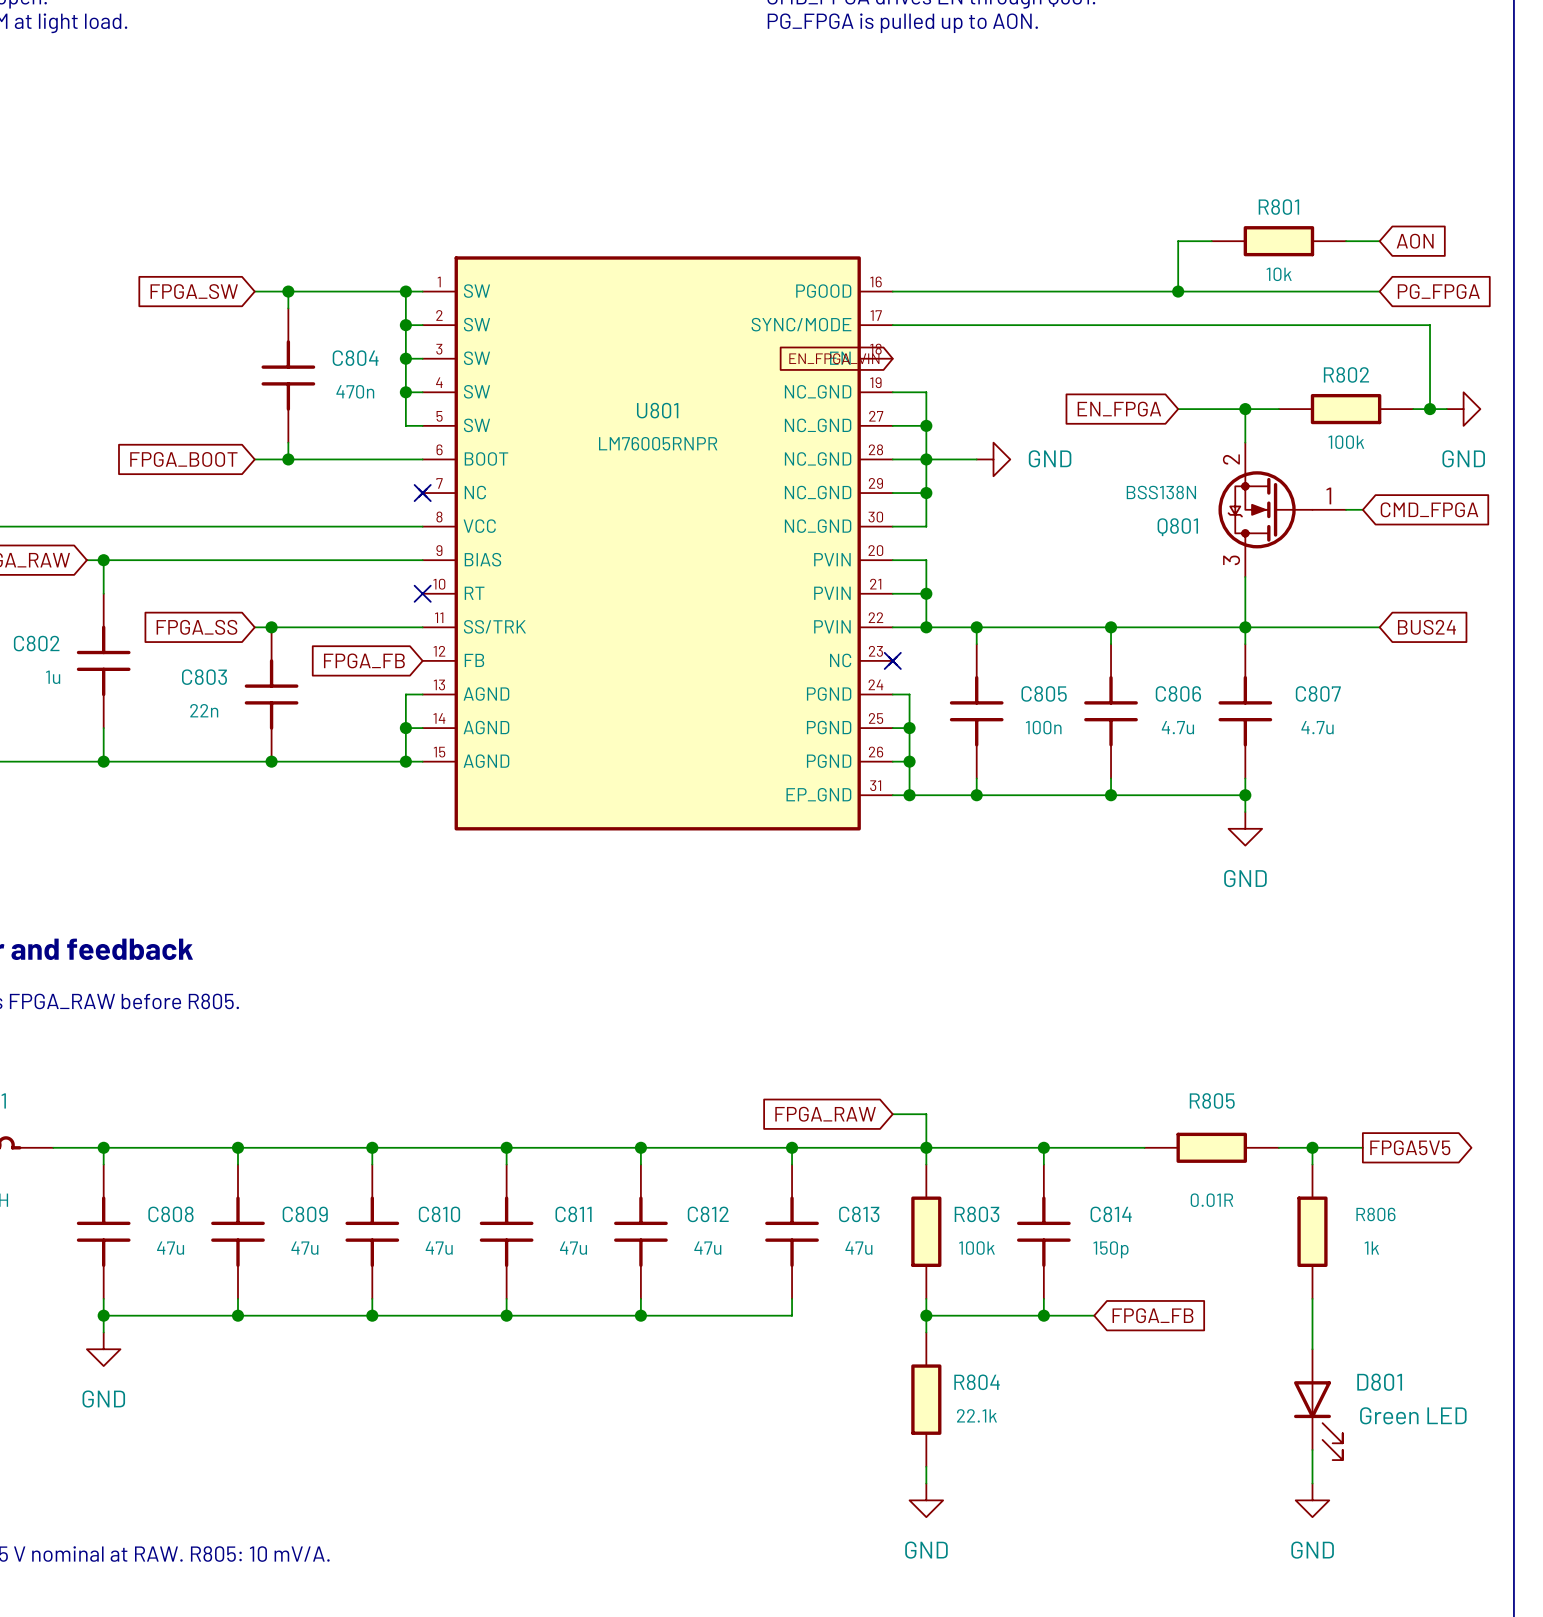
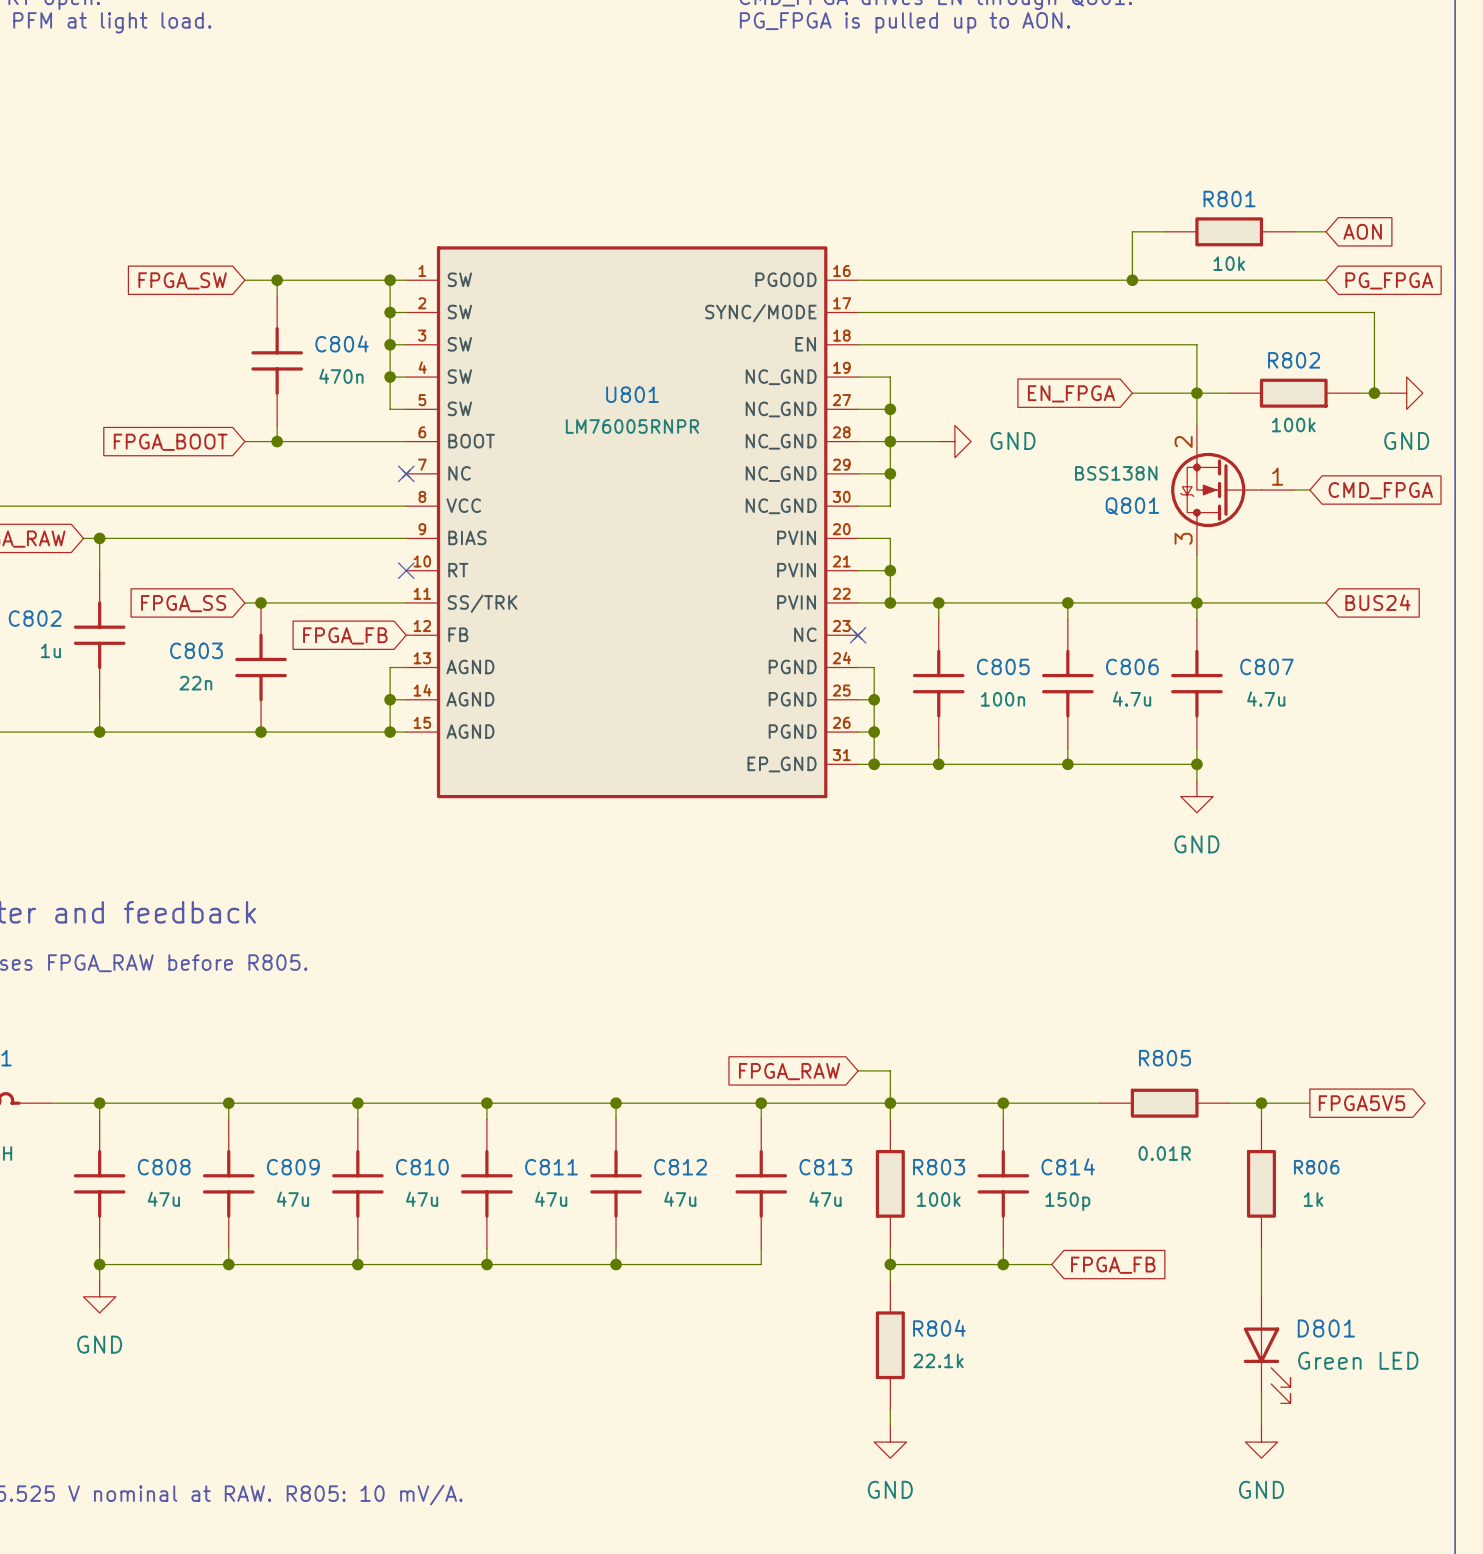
global label: EN_FPGA_VIN (834, 358) -> none
wire: none -> (858, 344) (1196, 344) (1196, 393)

